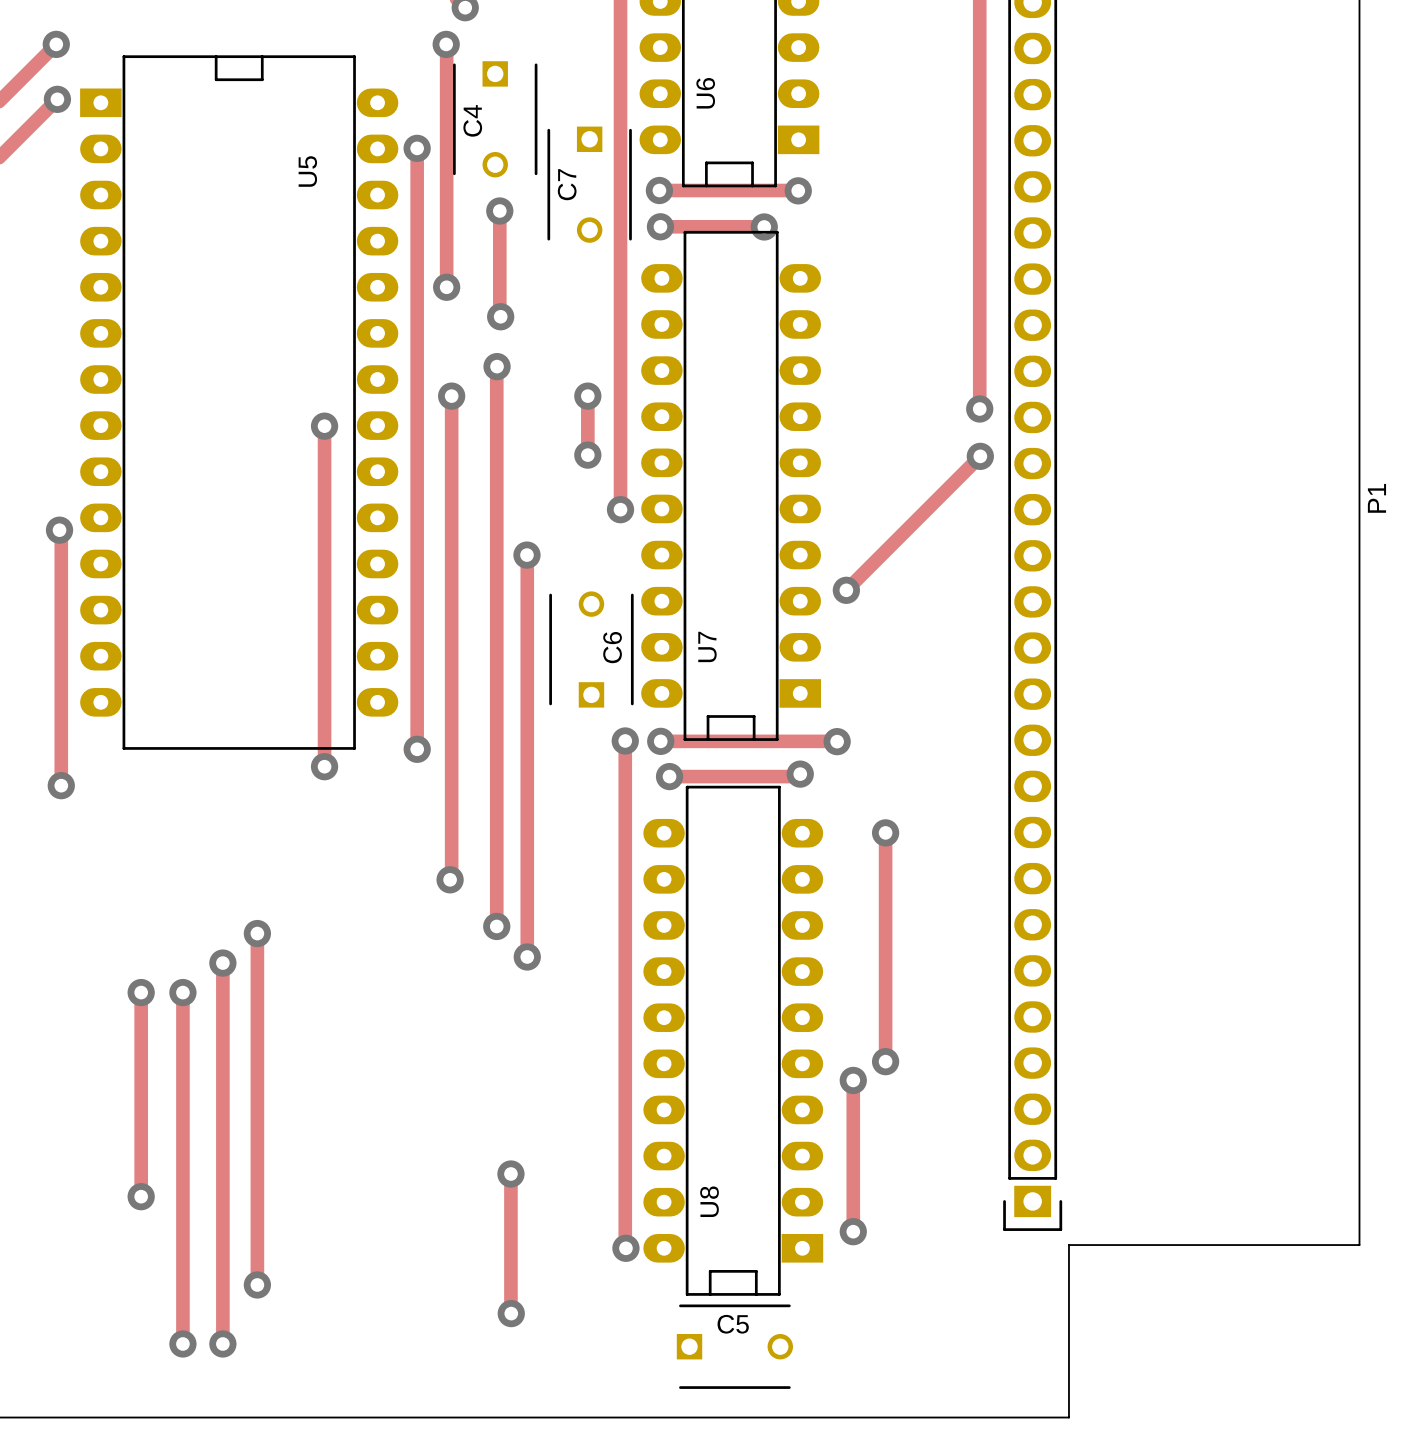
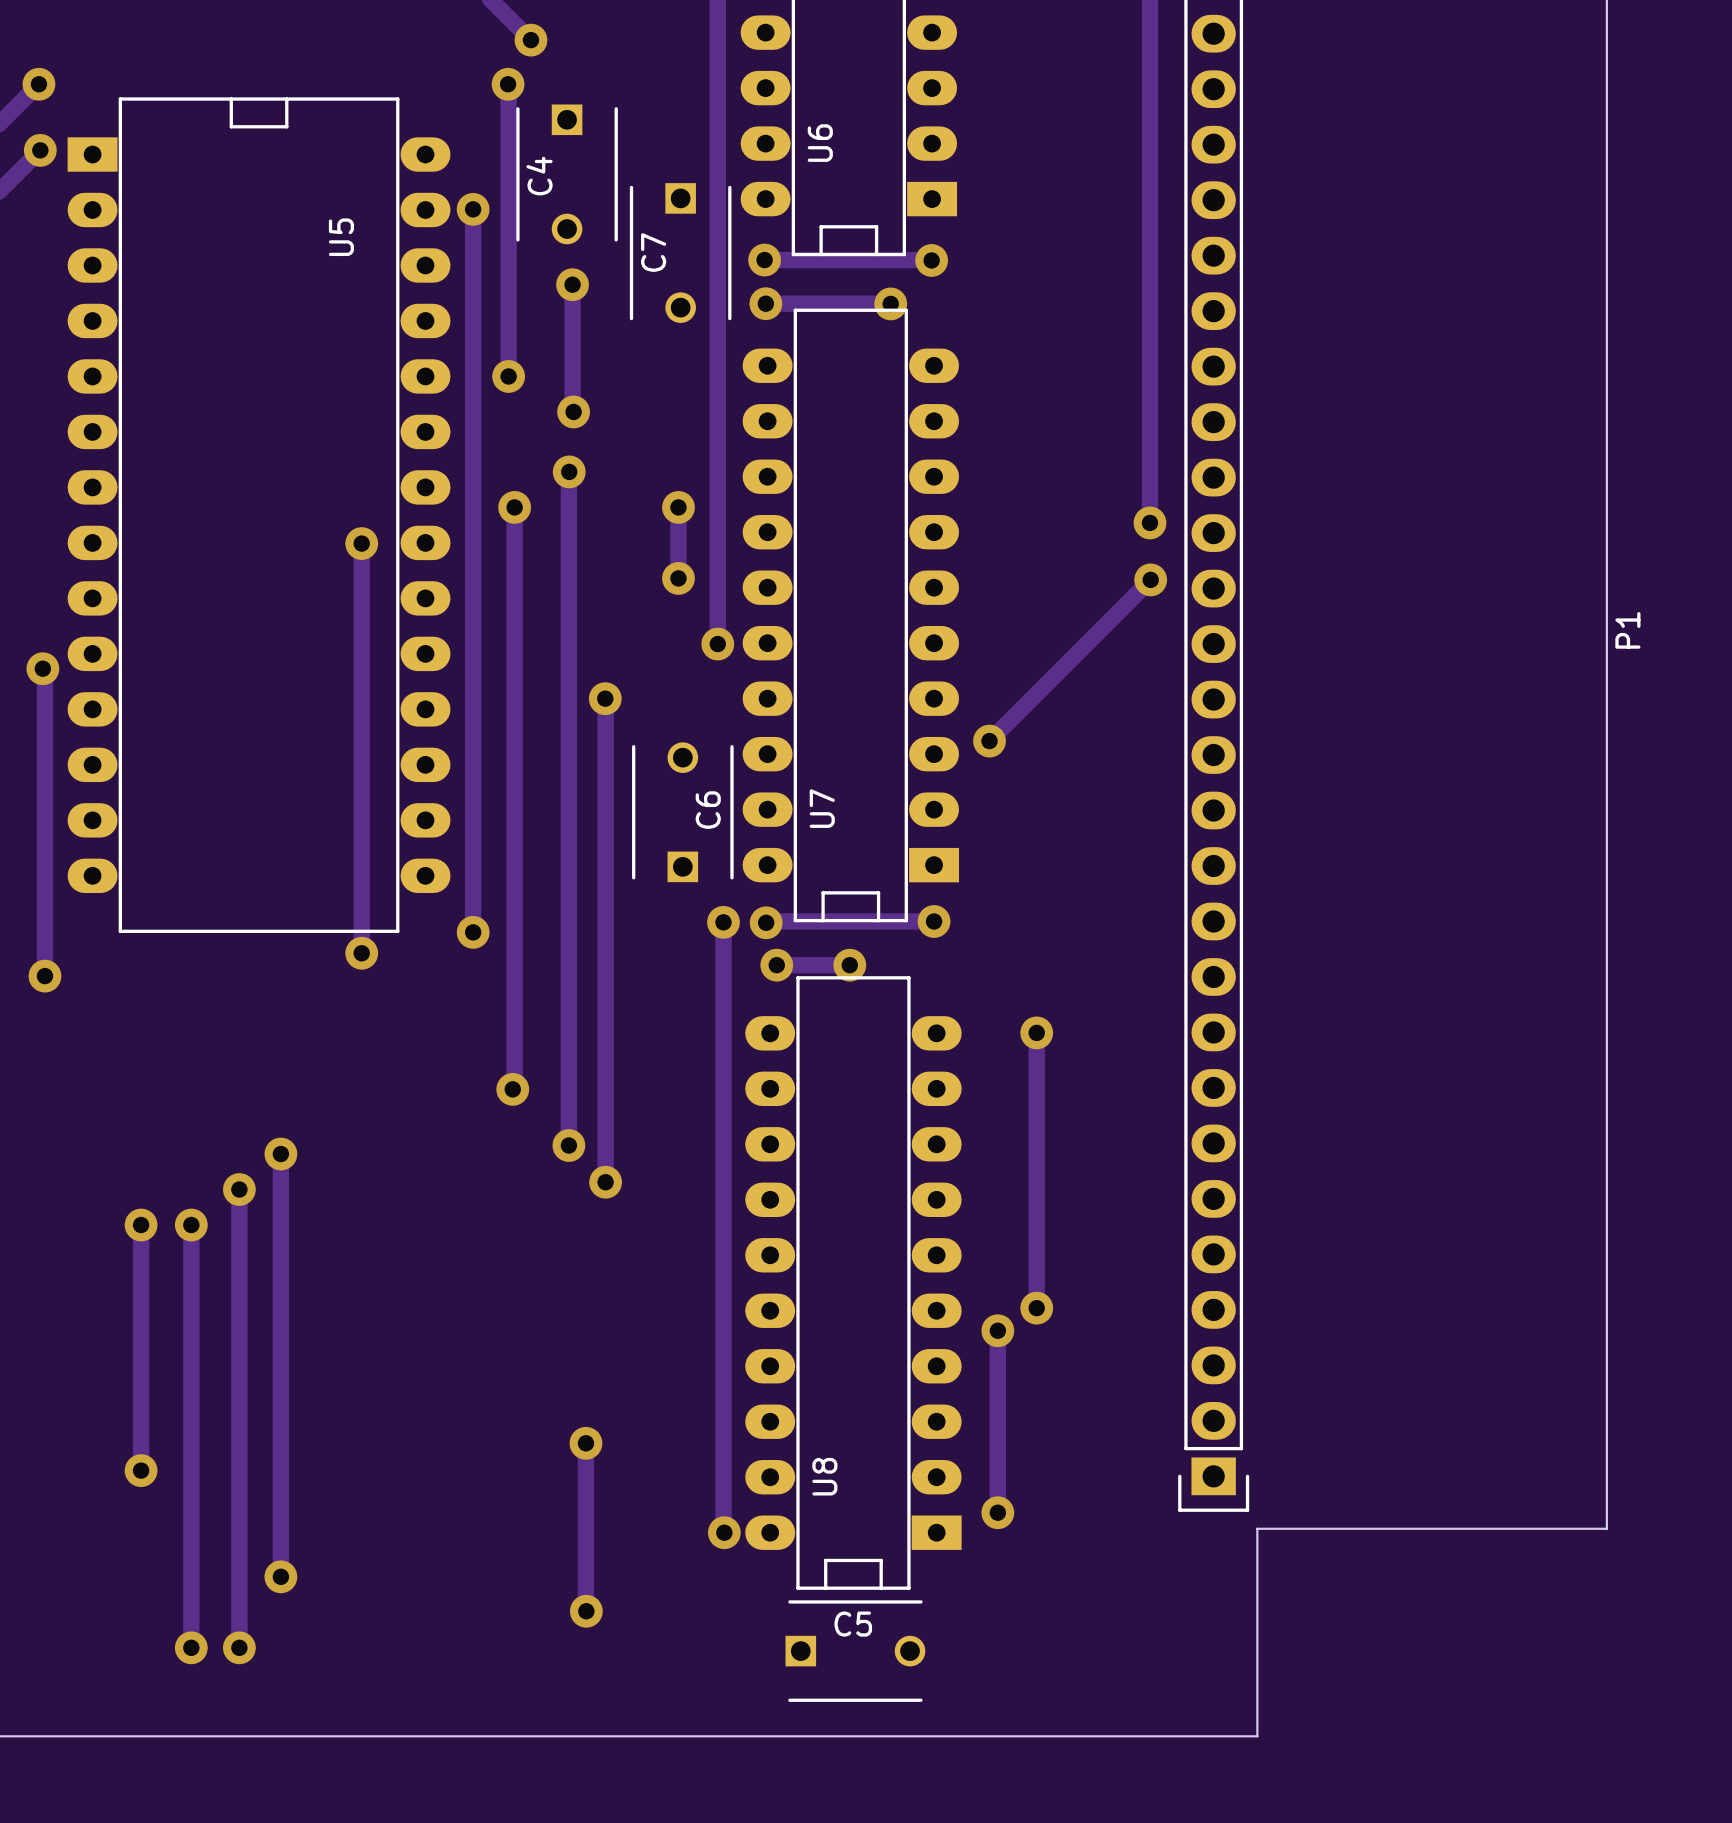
via: none -> (934, 921)
track: (660, 741) (837, 741) -> (766, 922) (934, 921)
via: (837, 741) -> none
track: (800, 774) (797, 776) (730, 776) -> none
via: (800, 774) -> none
via: none -> (849, 965)

